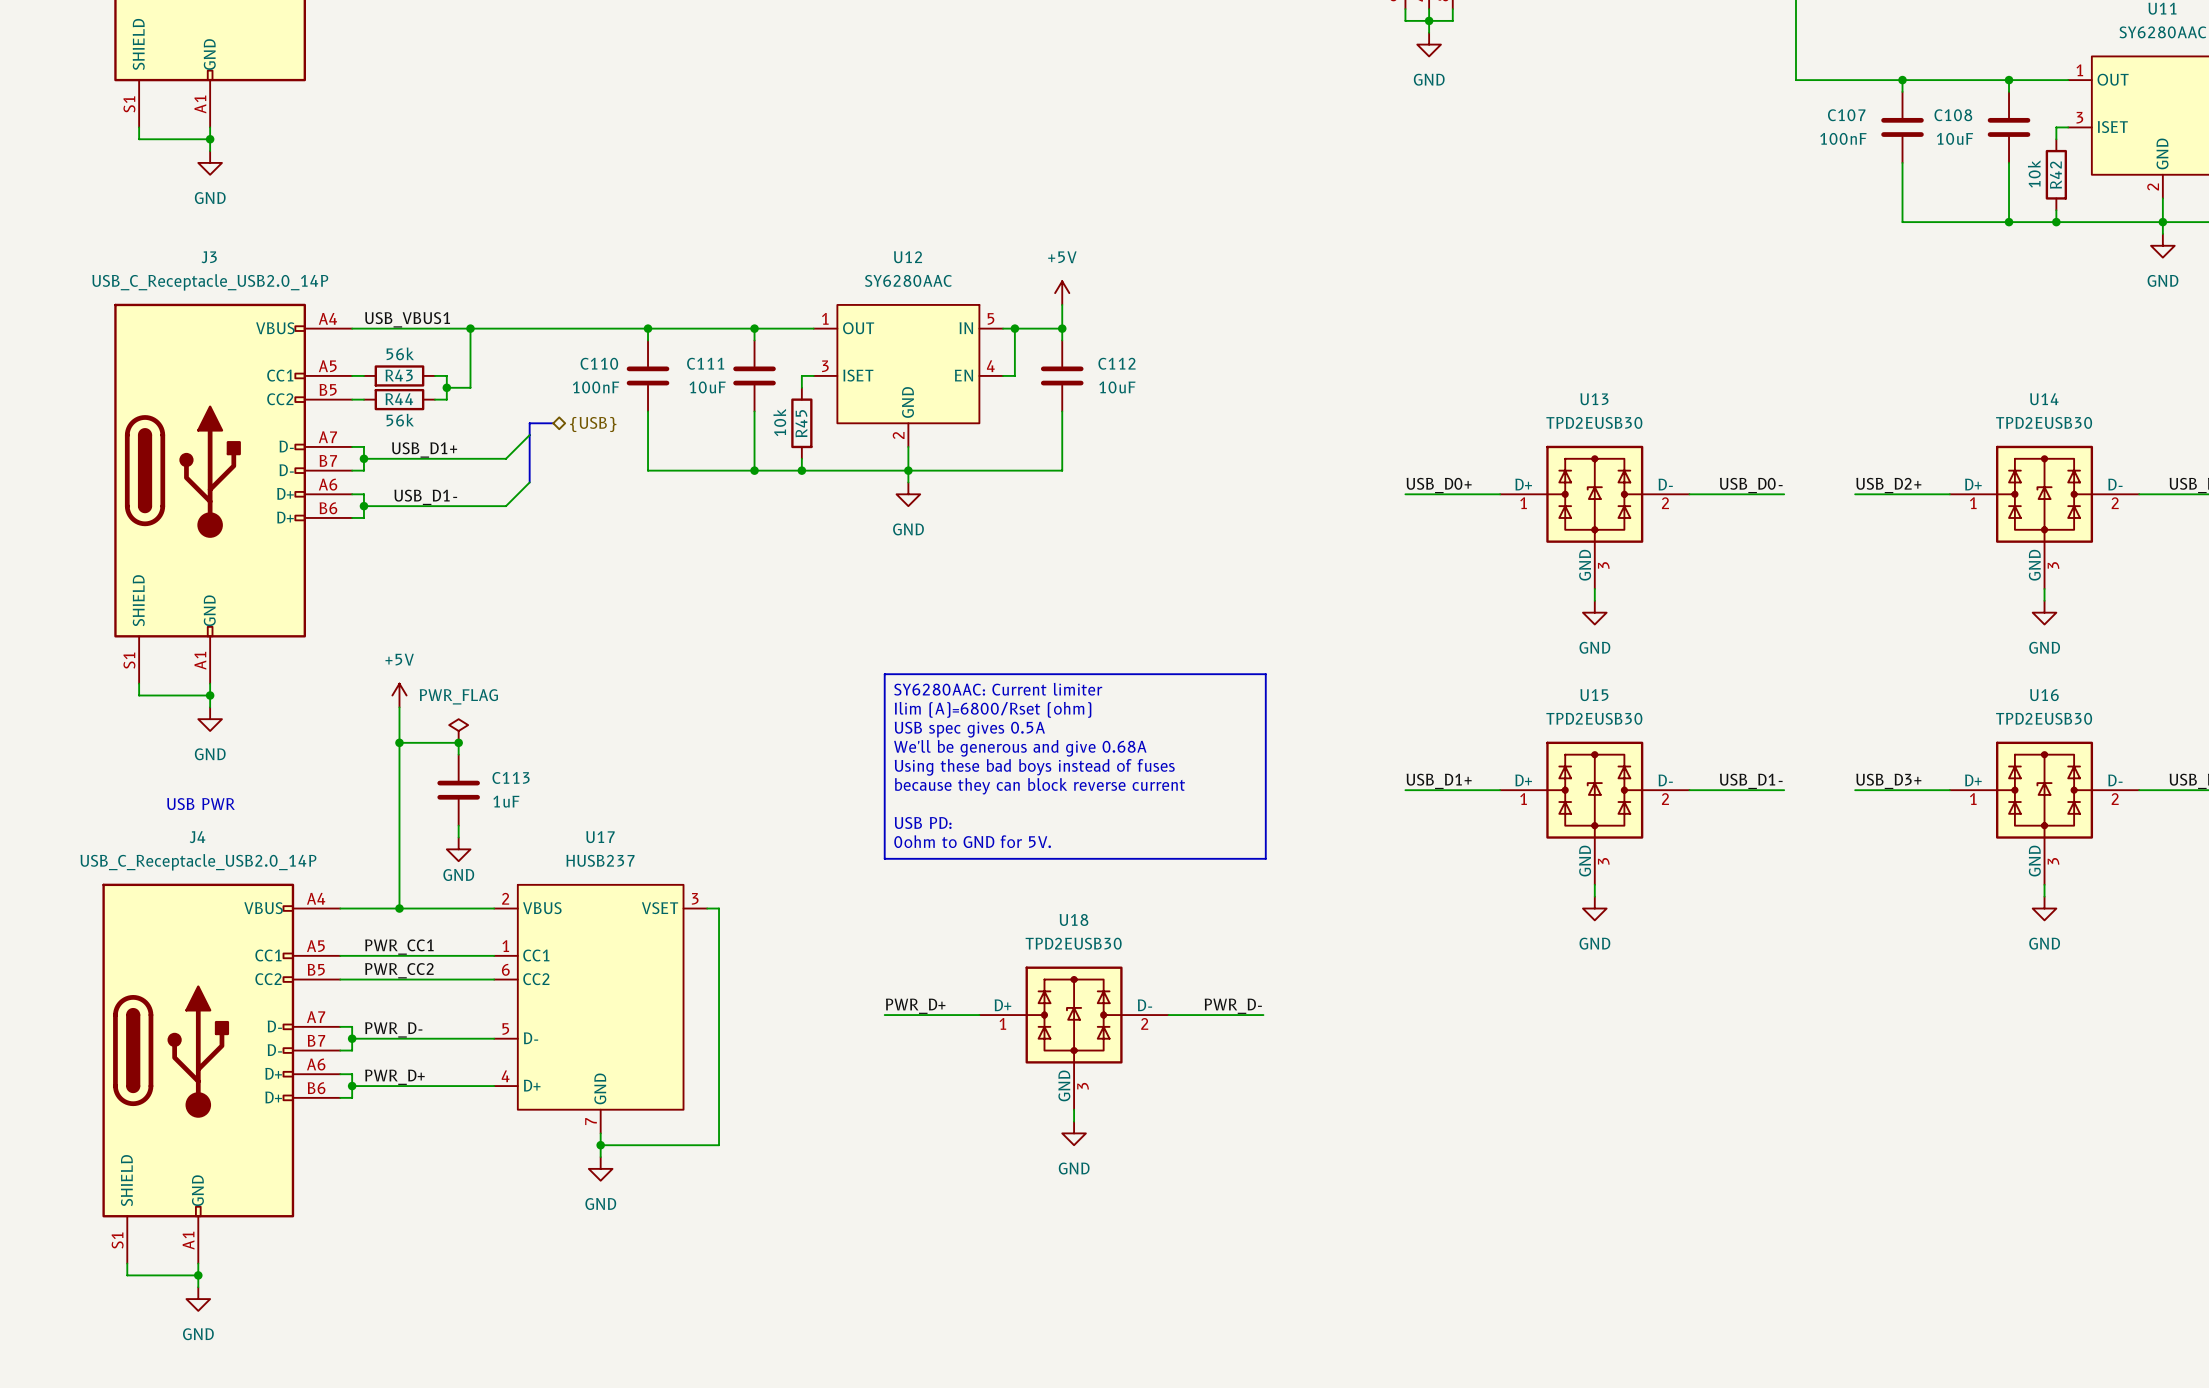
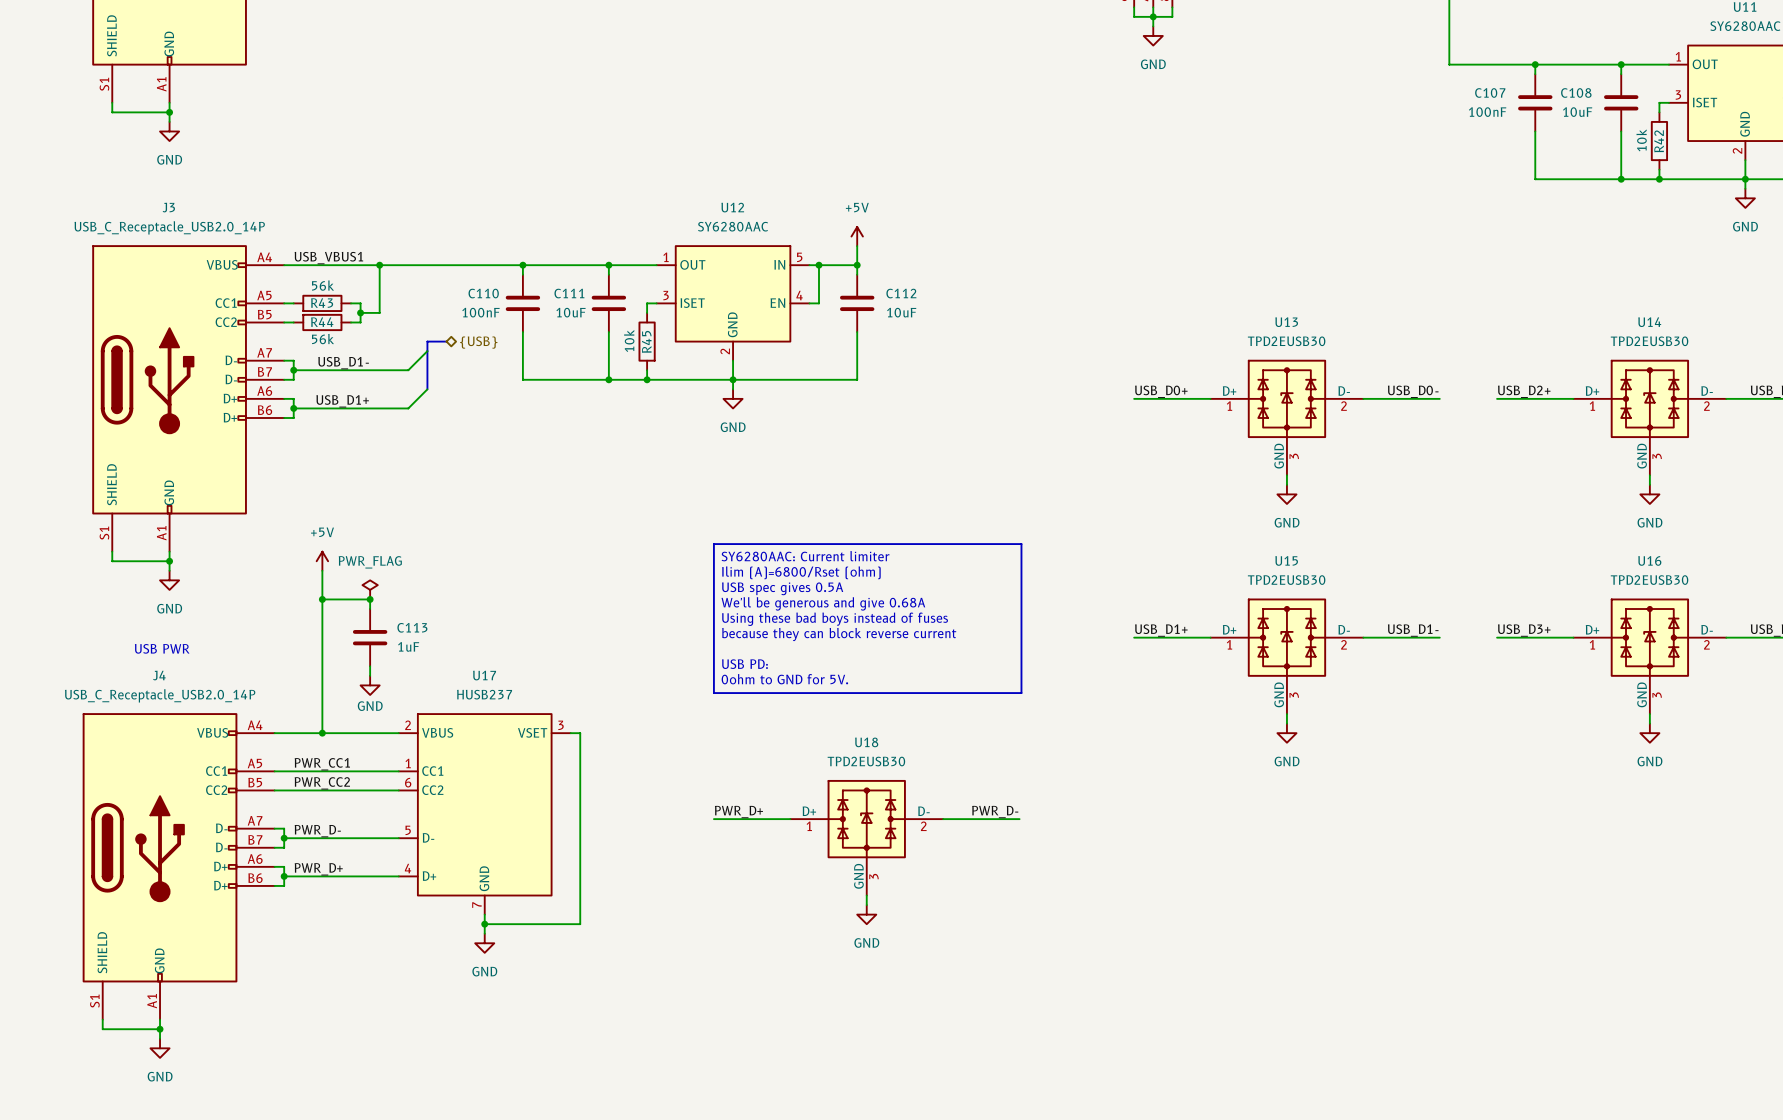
label: USB_D1+ (424, 450) -> USB_D1- (343, 363)
label: USB_D1- (425, 497) -> USB_D1+ (342, 401)

